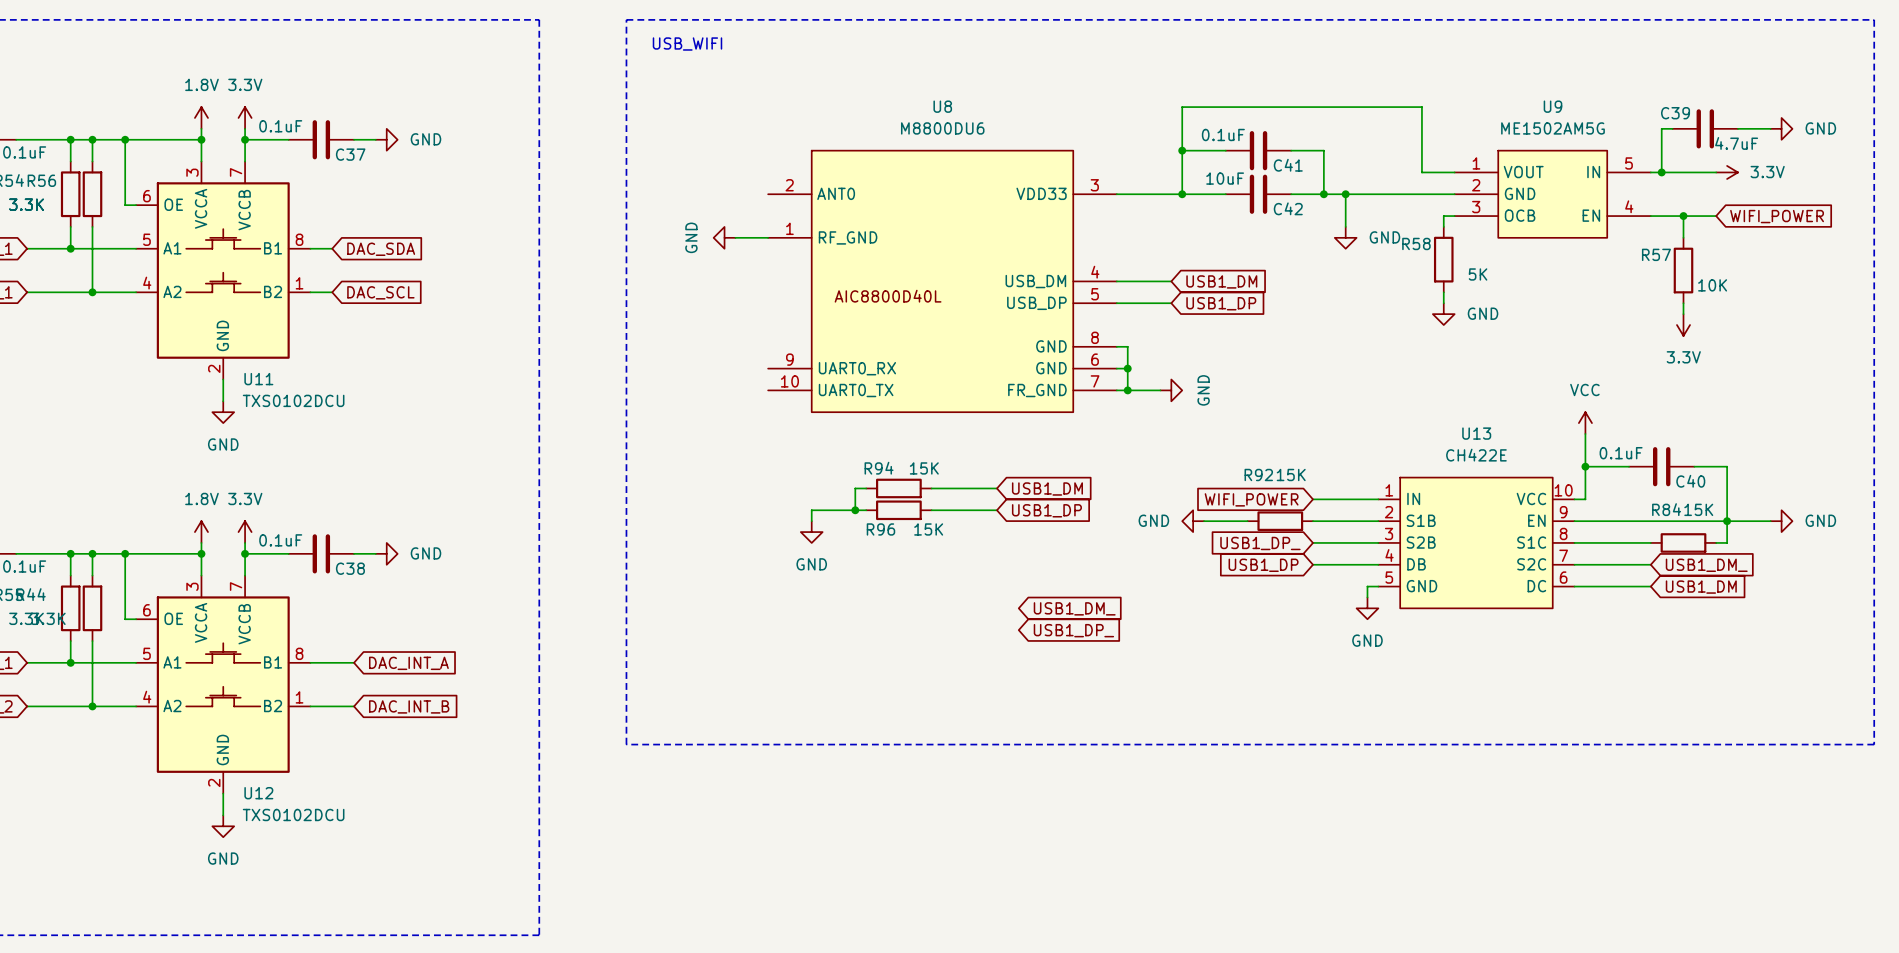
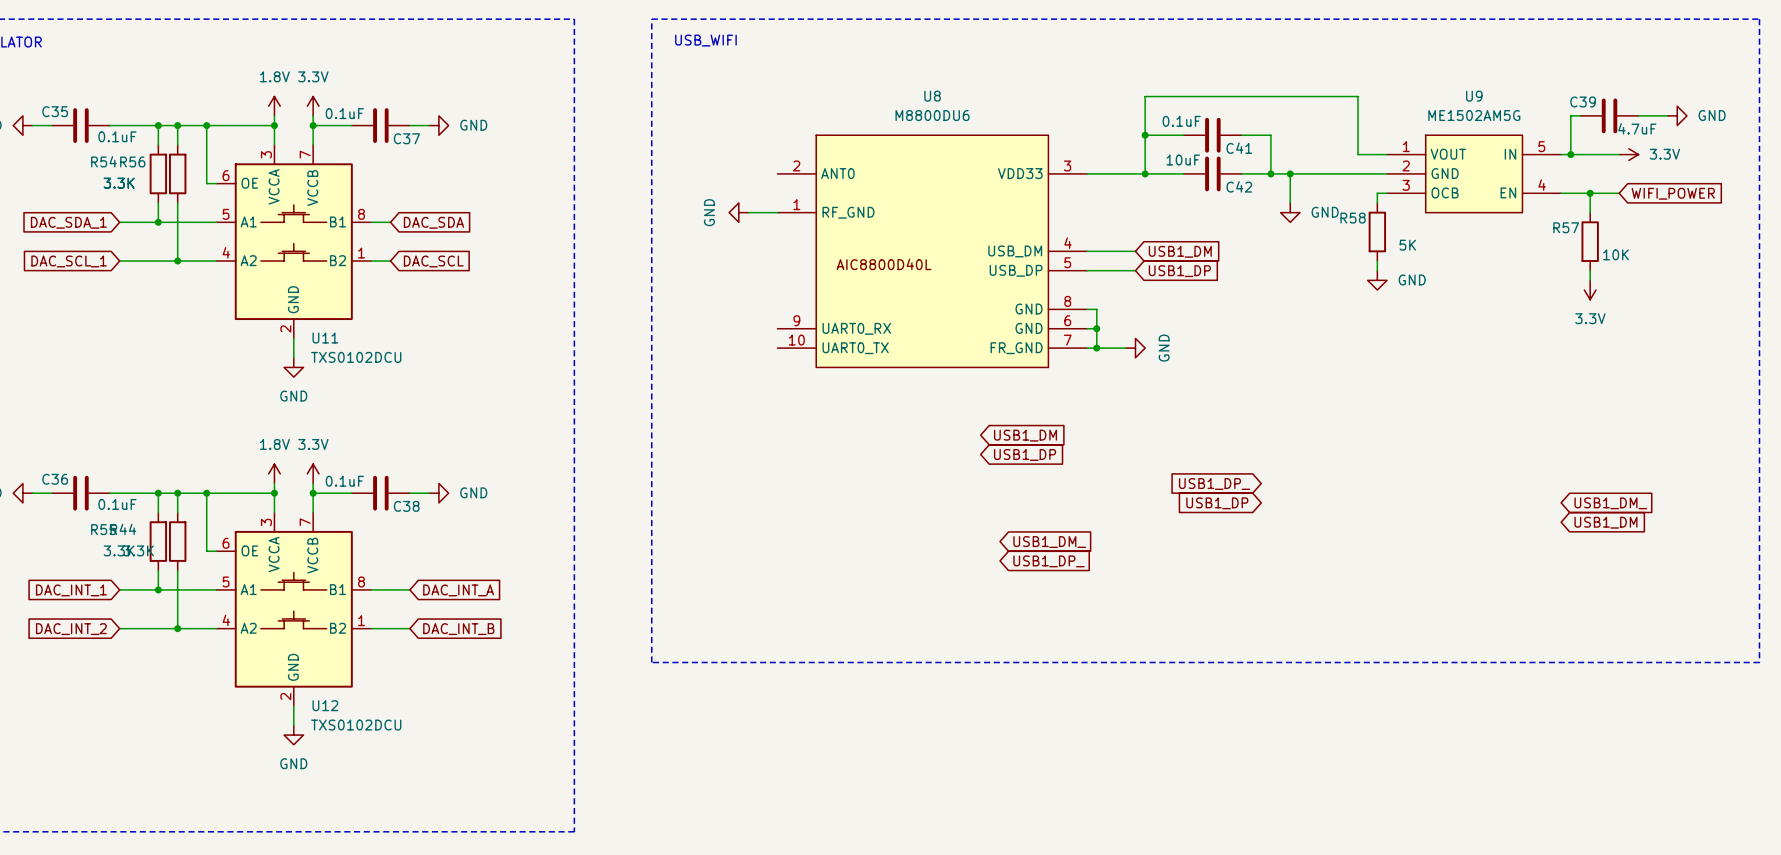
power symbol: VCC (1585, 423) -> none
wire: (1585, 433) (1585, 499) (1574, 499) -> none
wire: (1585, 466) (1629, 466) -> none
junction: (1585, 466) -> none
C40: 0.1uF (1661, 466) -> none
wire: (1694, 466) (1727, 466) (1727, 542) (1716, 542) -> none
wire: (866, 488) (855, 488) (855, 510) -> none
R94: 15K (898, 488) -> none
wire: (931, 488) (996, 488) -> none
global label: WIFI_POWER (1251, 499) -> none
wire: (1312, 499) (1378, 499) -> none
junction: (855, 510) -> none
wire: (866, 510) (811, 510) (811, 521) -> none
R96: 15K (898, 510) -> none
wire: (931, 510) (996, 510) -> none
power symbol: GND (1193, 521) -> none
wire: (1204, 521) (1247, 521) -> none
R92: 15K (1280, 521) -> none
wire: (1312, 521) (1378, 521) -> none
wire: (1574, 521) (1770, 521) -> none
junction: (1727, 521) -> none
power symbol: GND (1781, 521) -> none
power symbol: GND (811, 532) -> none
wire: (1312, 542) (1378, 542) -> none
U13: CH422E (1476, 542) -> none
wire: (1574, 542) (1650, 542) -> none
R84: 15K (1683, 542) -> none
wire: (1312, 564) (1378, 564) -> none
wire: (1574, 564) (1650, 564) -> none
wire: (1378, 586) (1367, 586) (1367, 597) -> none
wire: (1574, 586) (1650, 586) -> none
power symbol: GND (1367, 608) -> none

